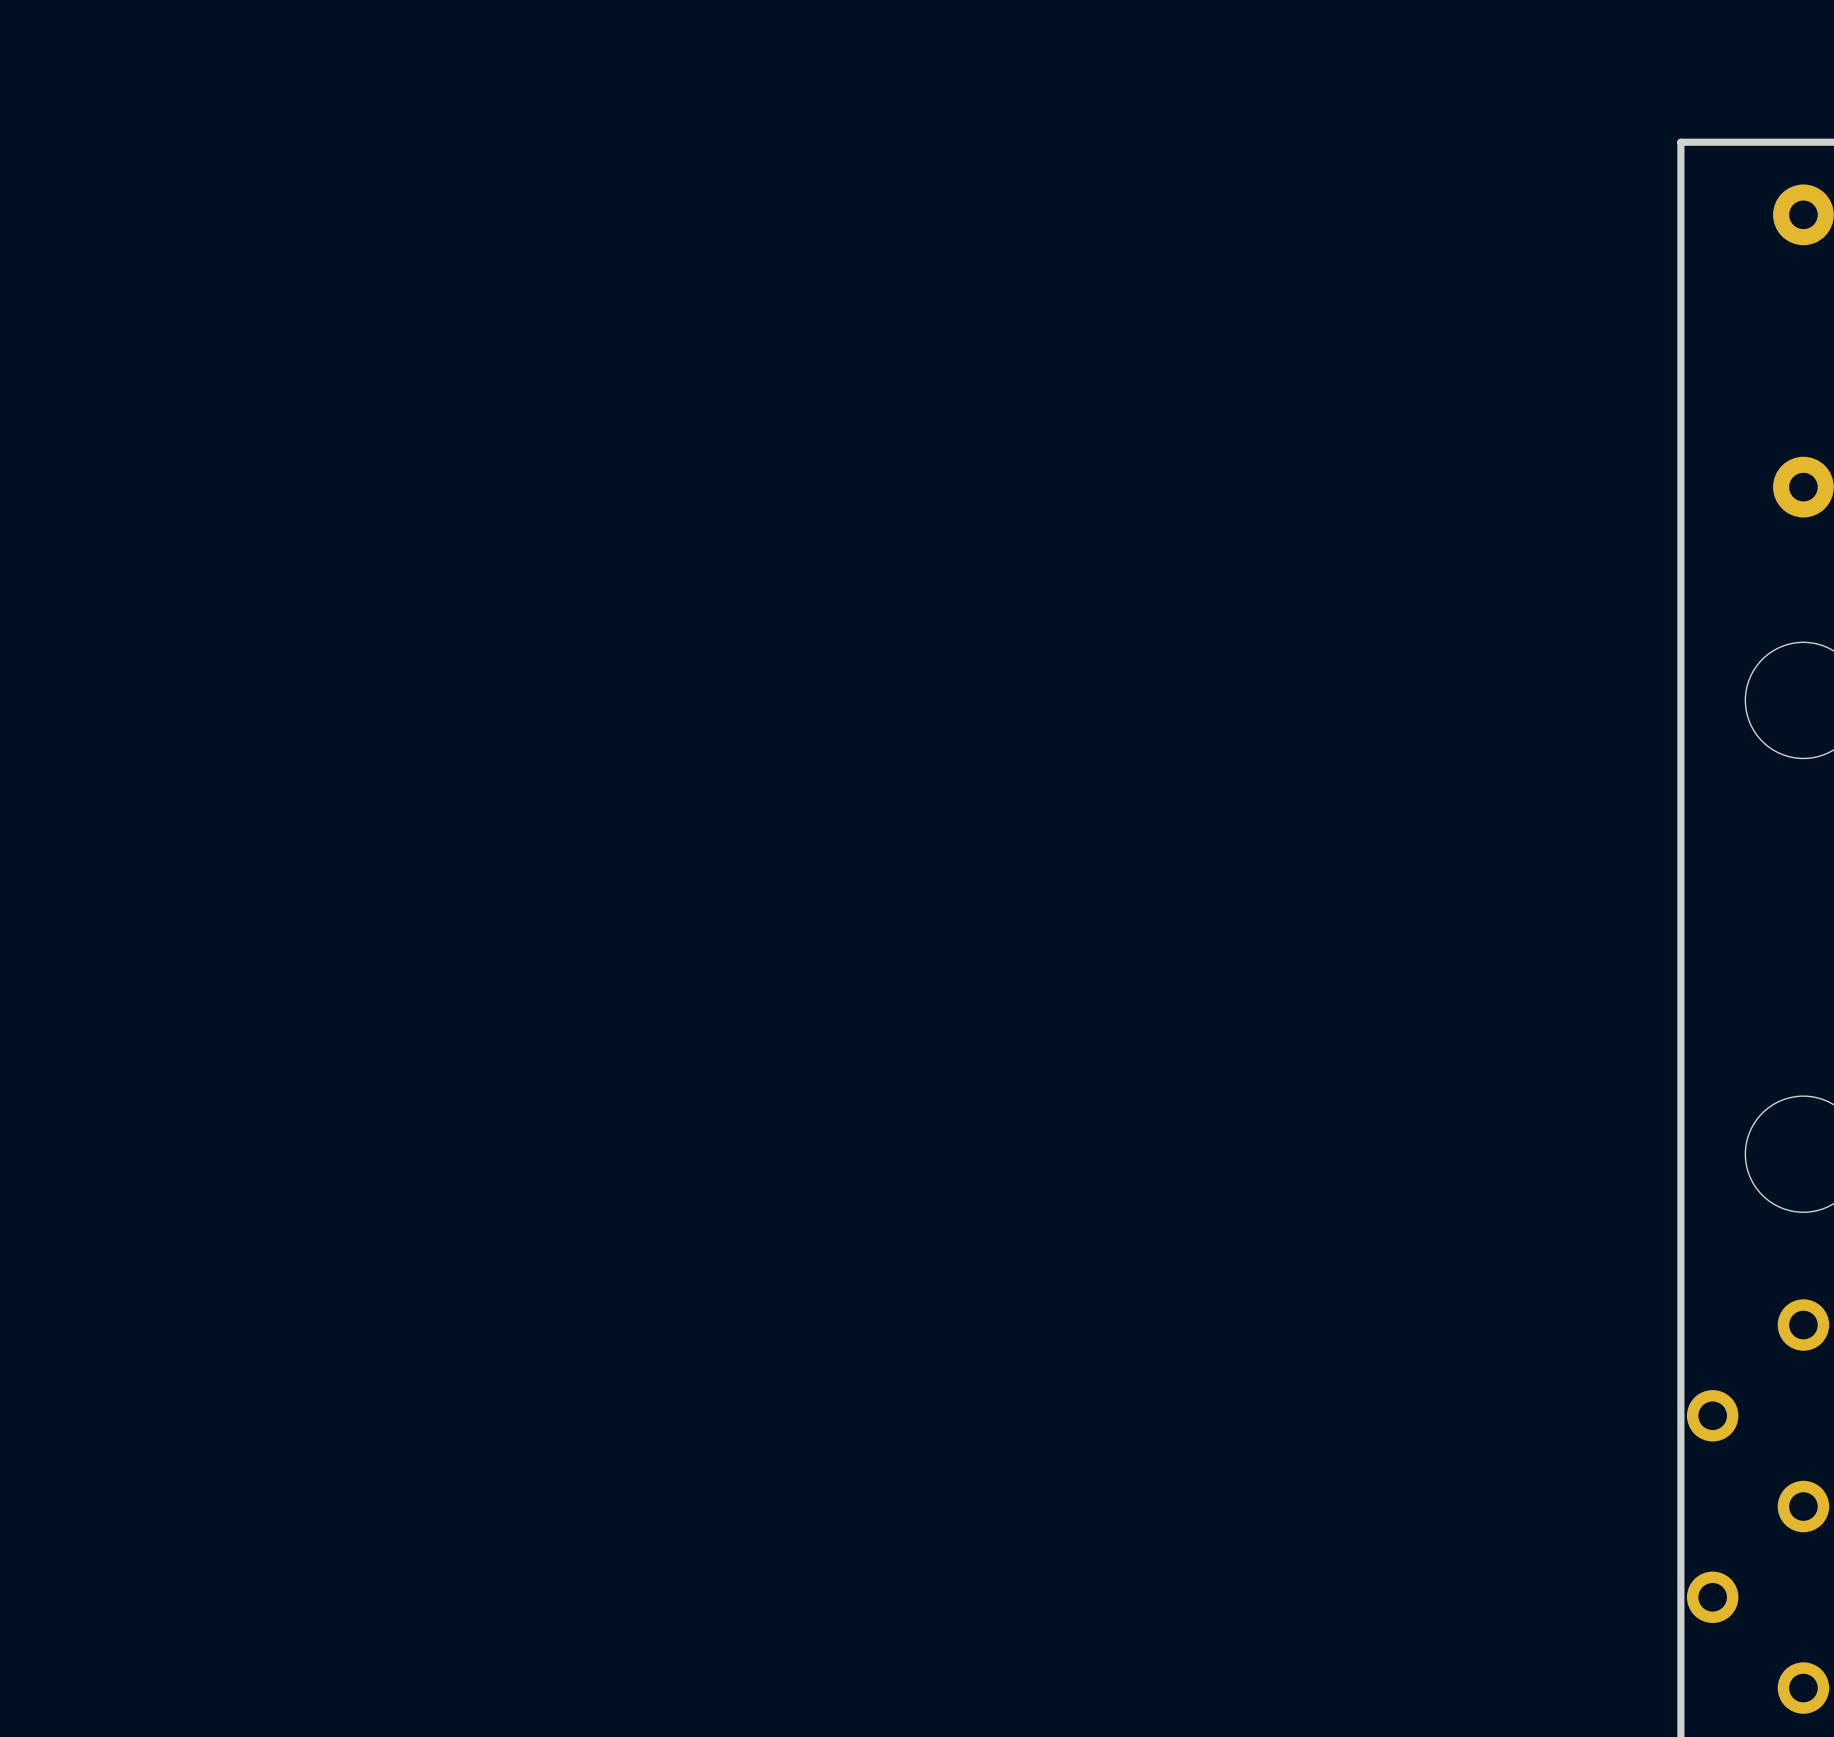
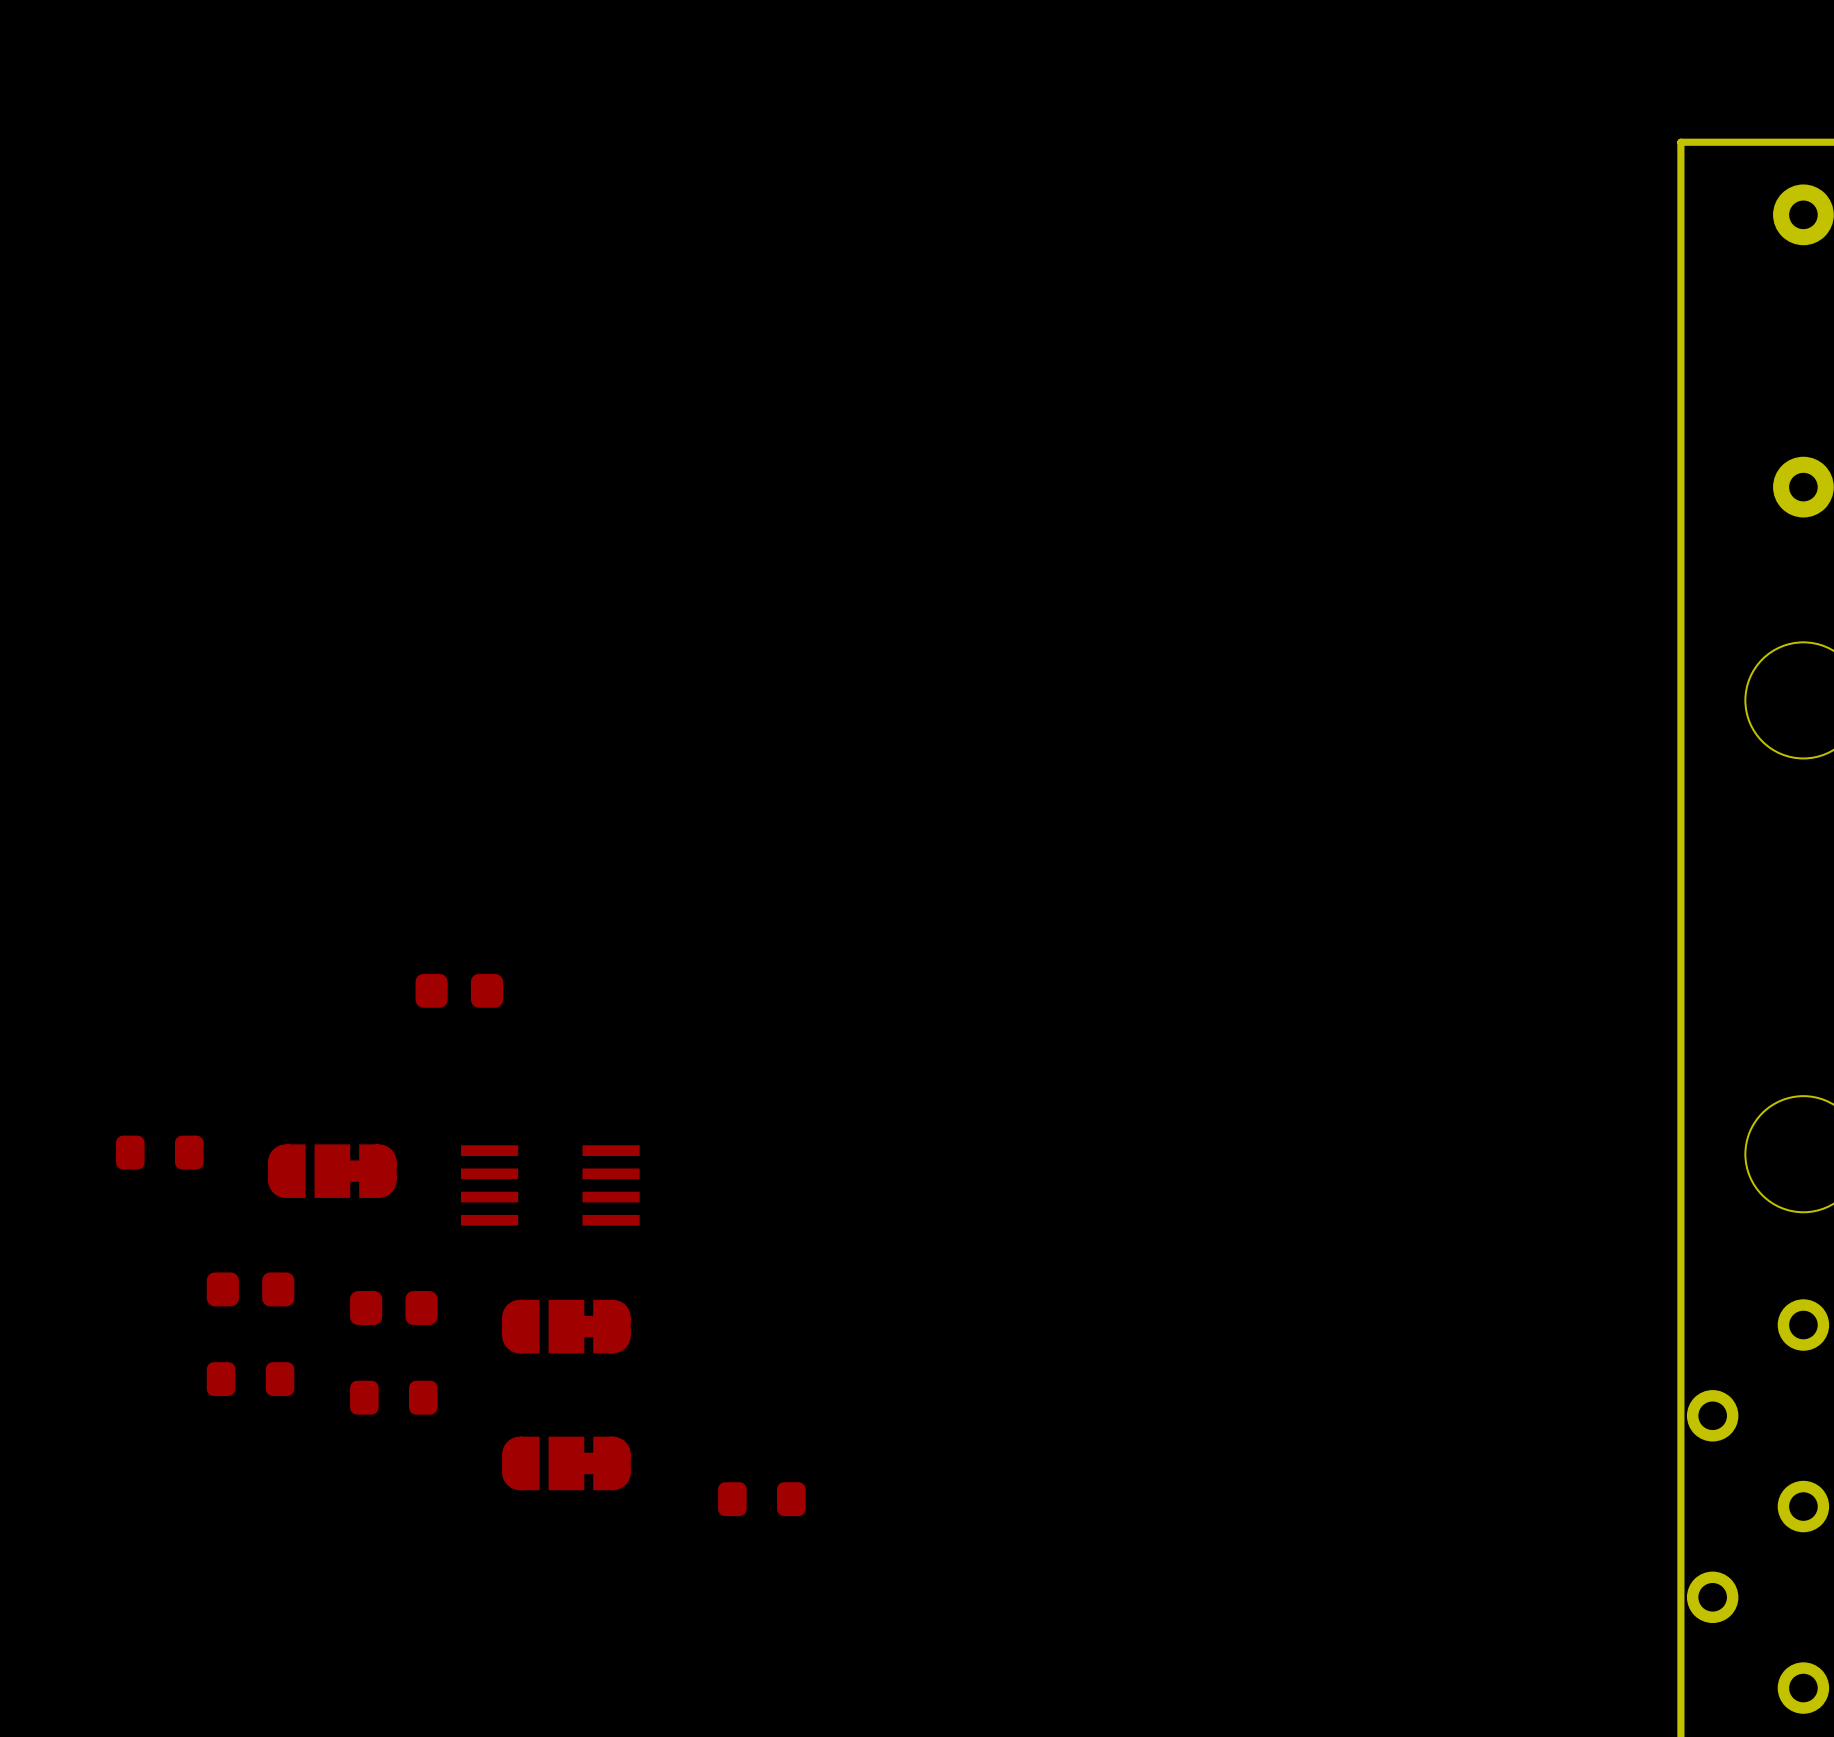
part: none -> (459, 990)
part: none -> (159, 1152)
part: none -> (332, 1171)
part: none -> (550, 1185)
part: none -> (250, 1289)
part: none -> (393, 1308)
part: none -> (566, 1326)
part: none -> (250, 1379)
part: none -> (393, 1397)
part: none -> (566, 1463)
part: none -> (761, 1499)

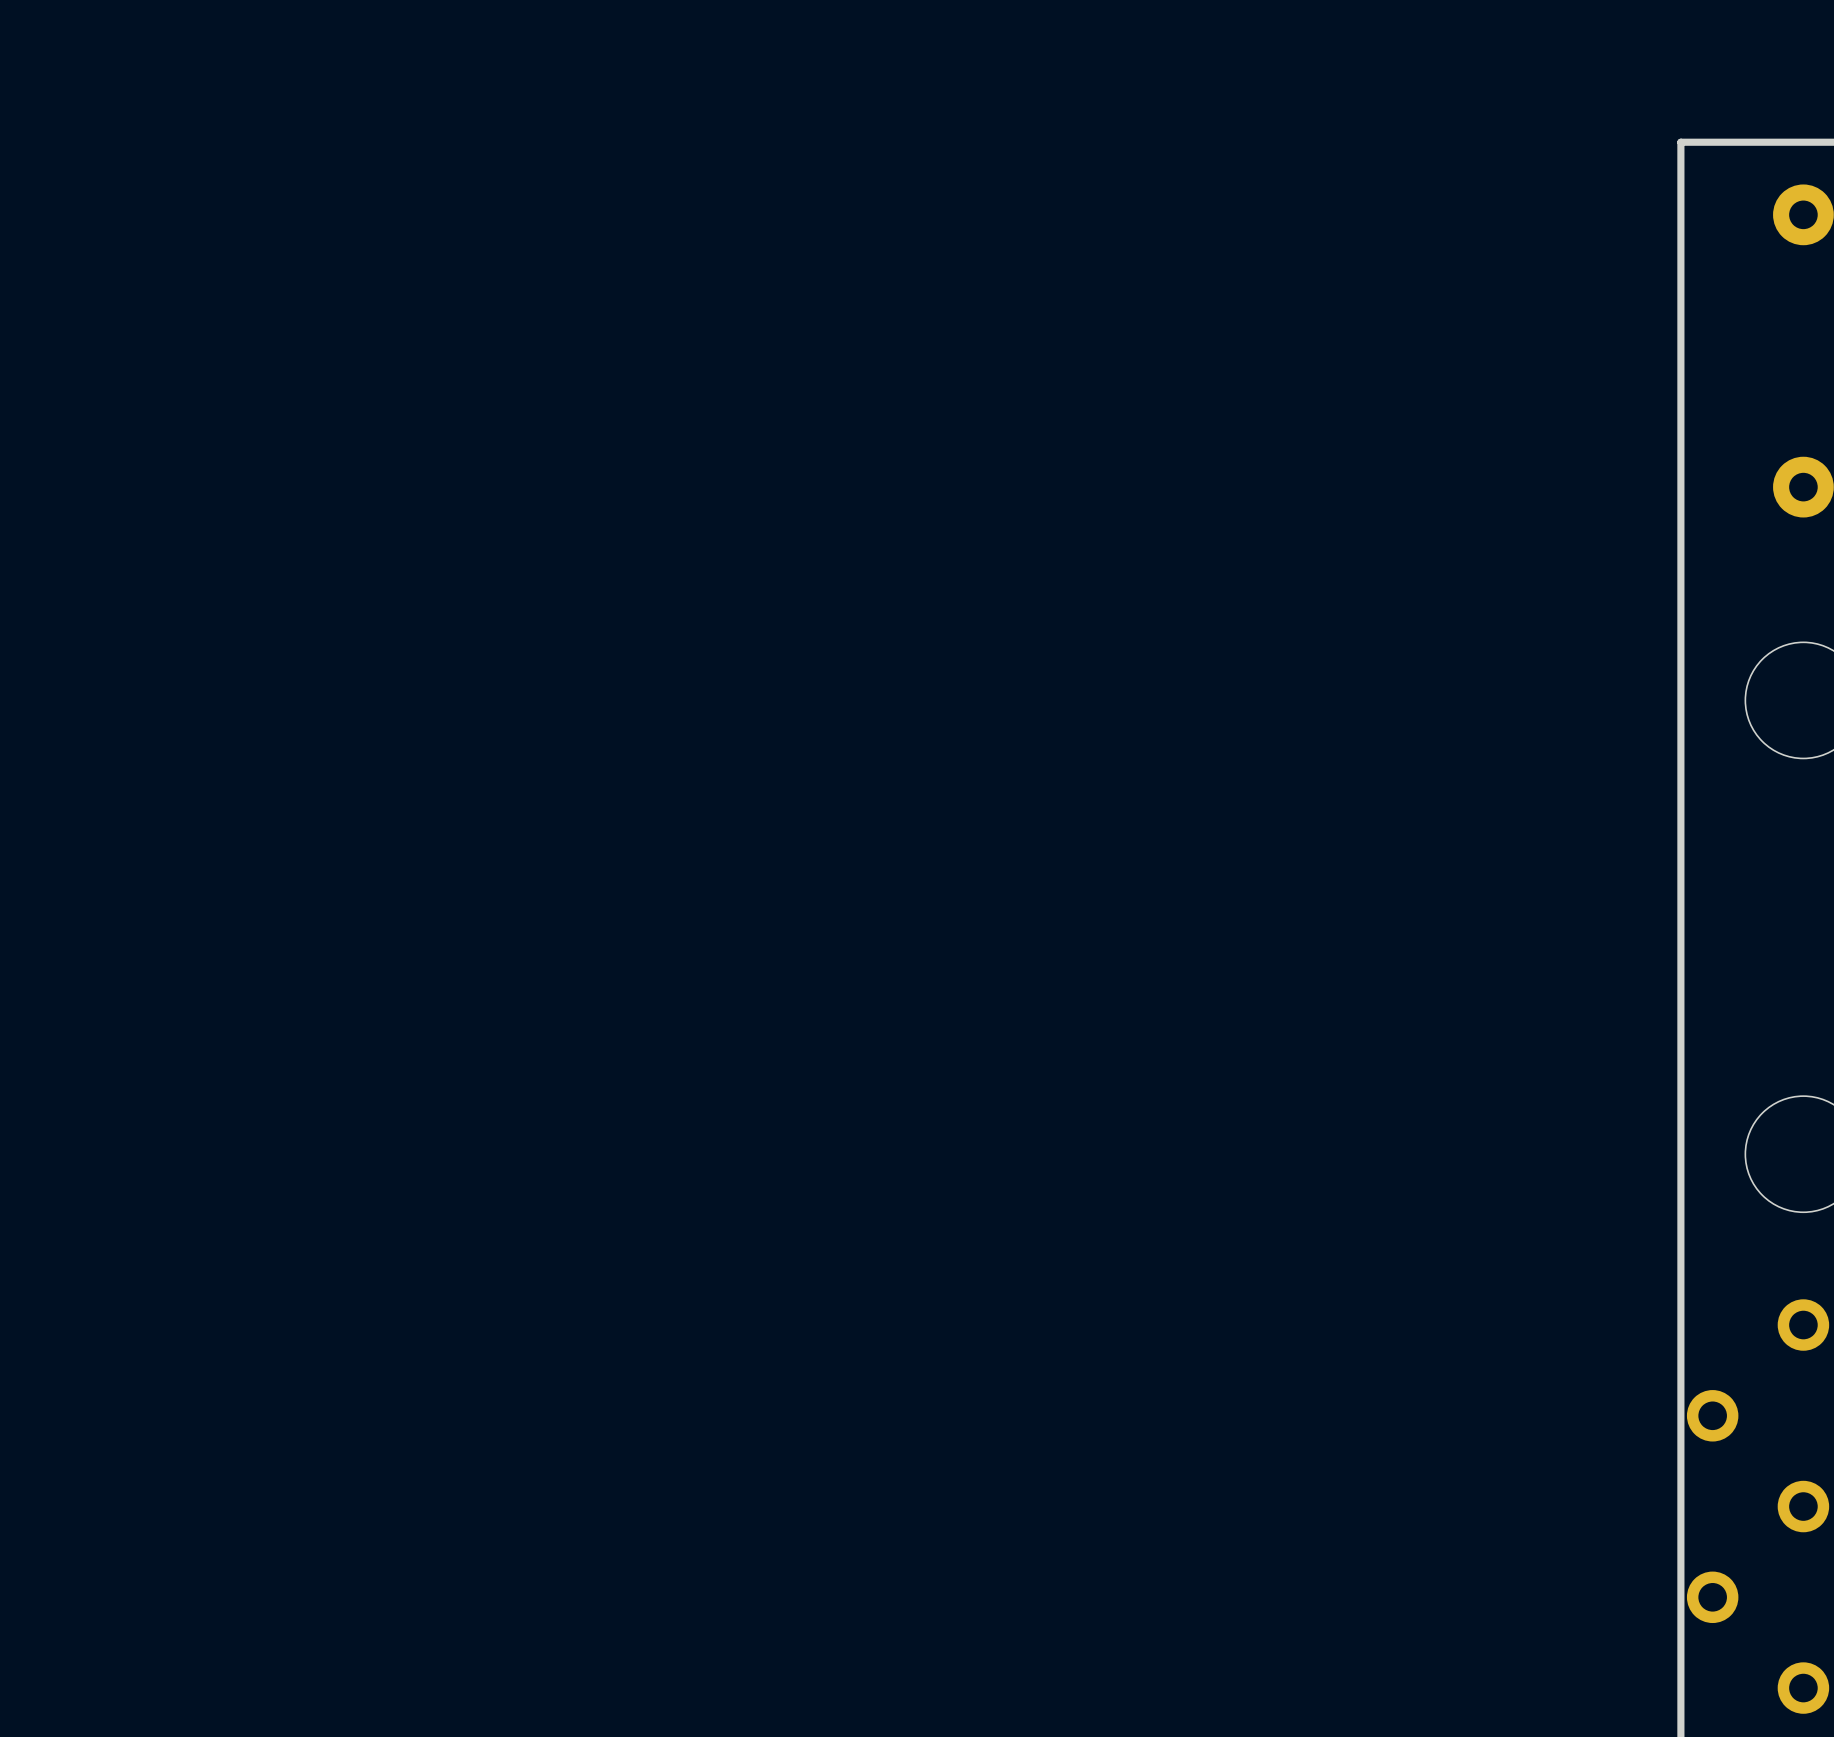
part: (459, 990) -> none
part: (159, 1152) -> none
part: (332, 1171) -> none
part: (550, 1185) -> none
part: (250, 1289) -> none
part: (393, 1308) -> none
part: (566, 1326) -> none
part: (250, 1379) -> none
part: (393, 1397) -> none
part: (566, 1463) -> none
part: (761, 1499) -> none

